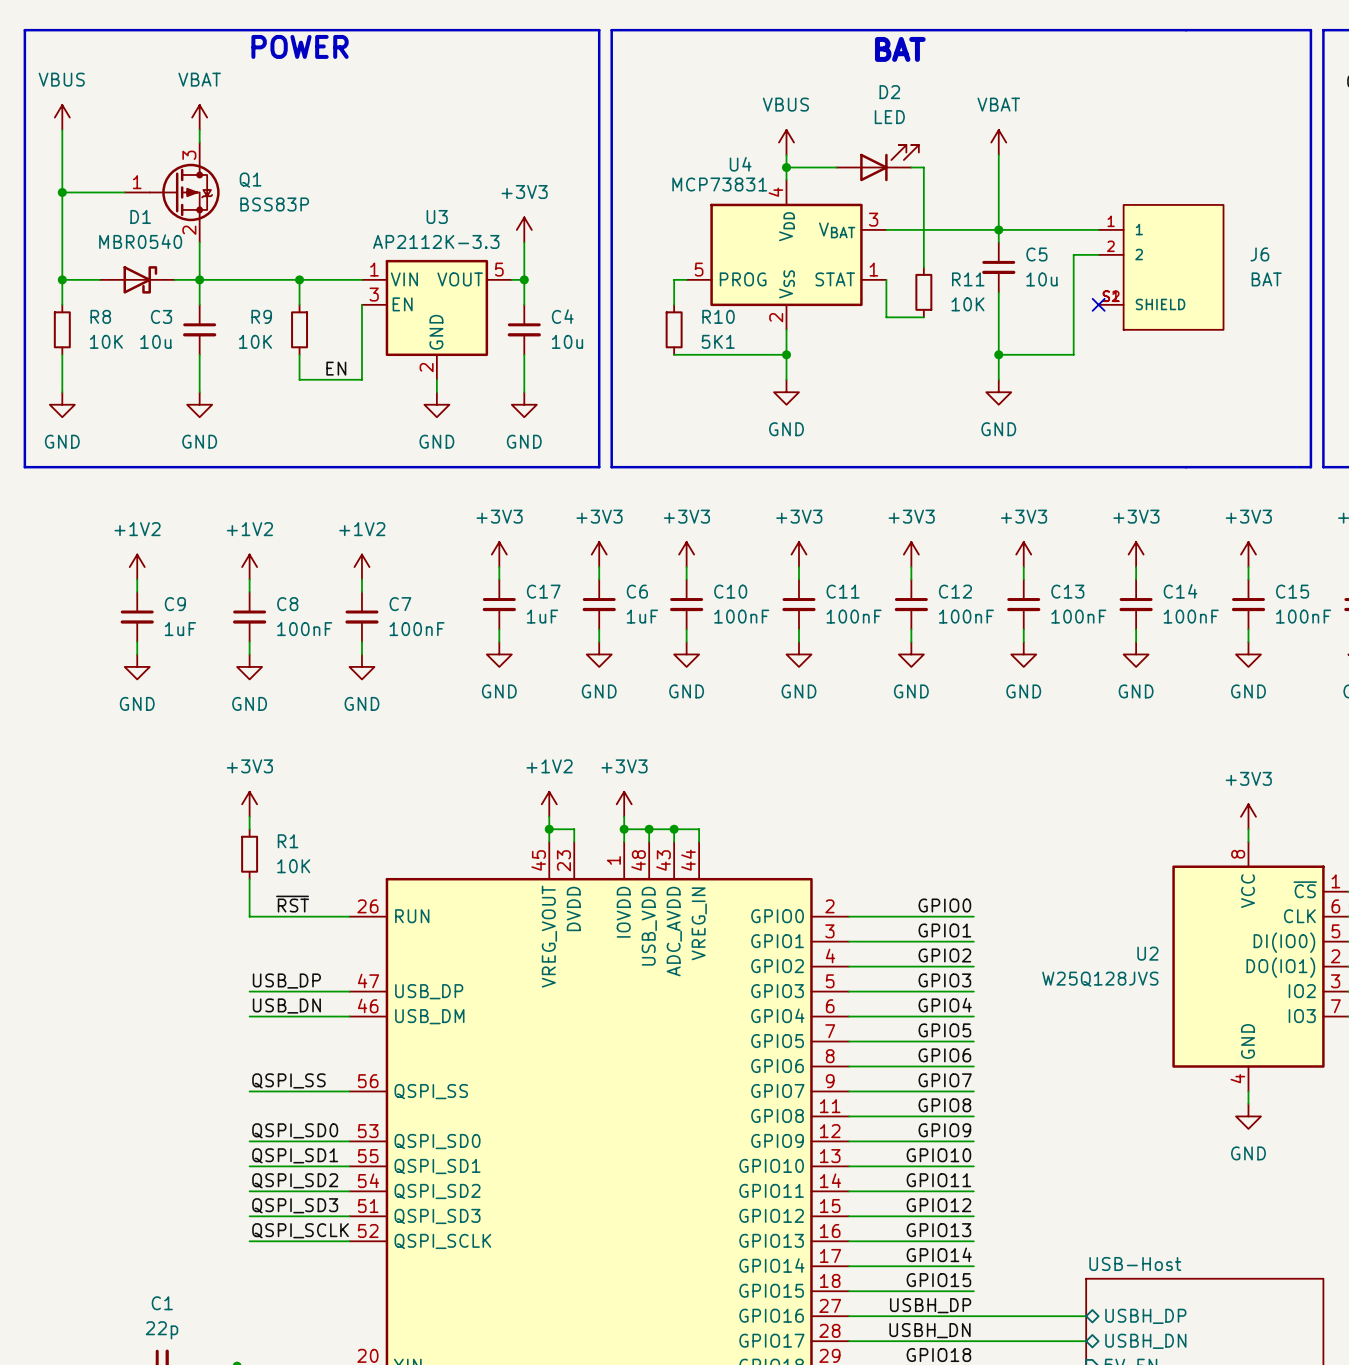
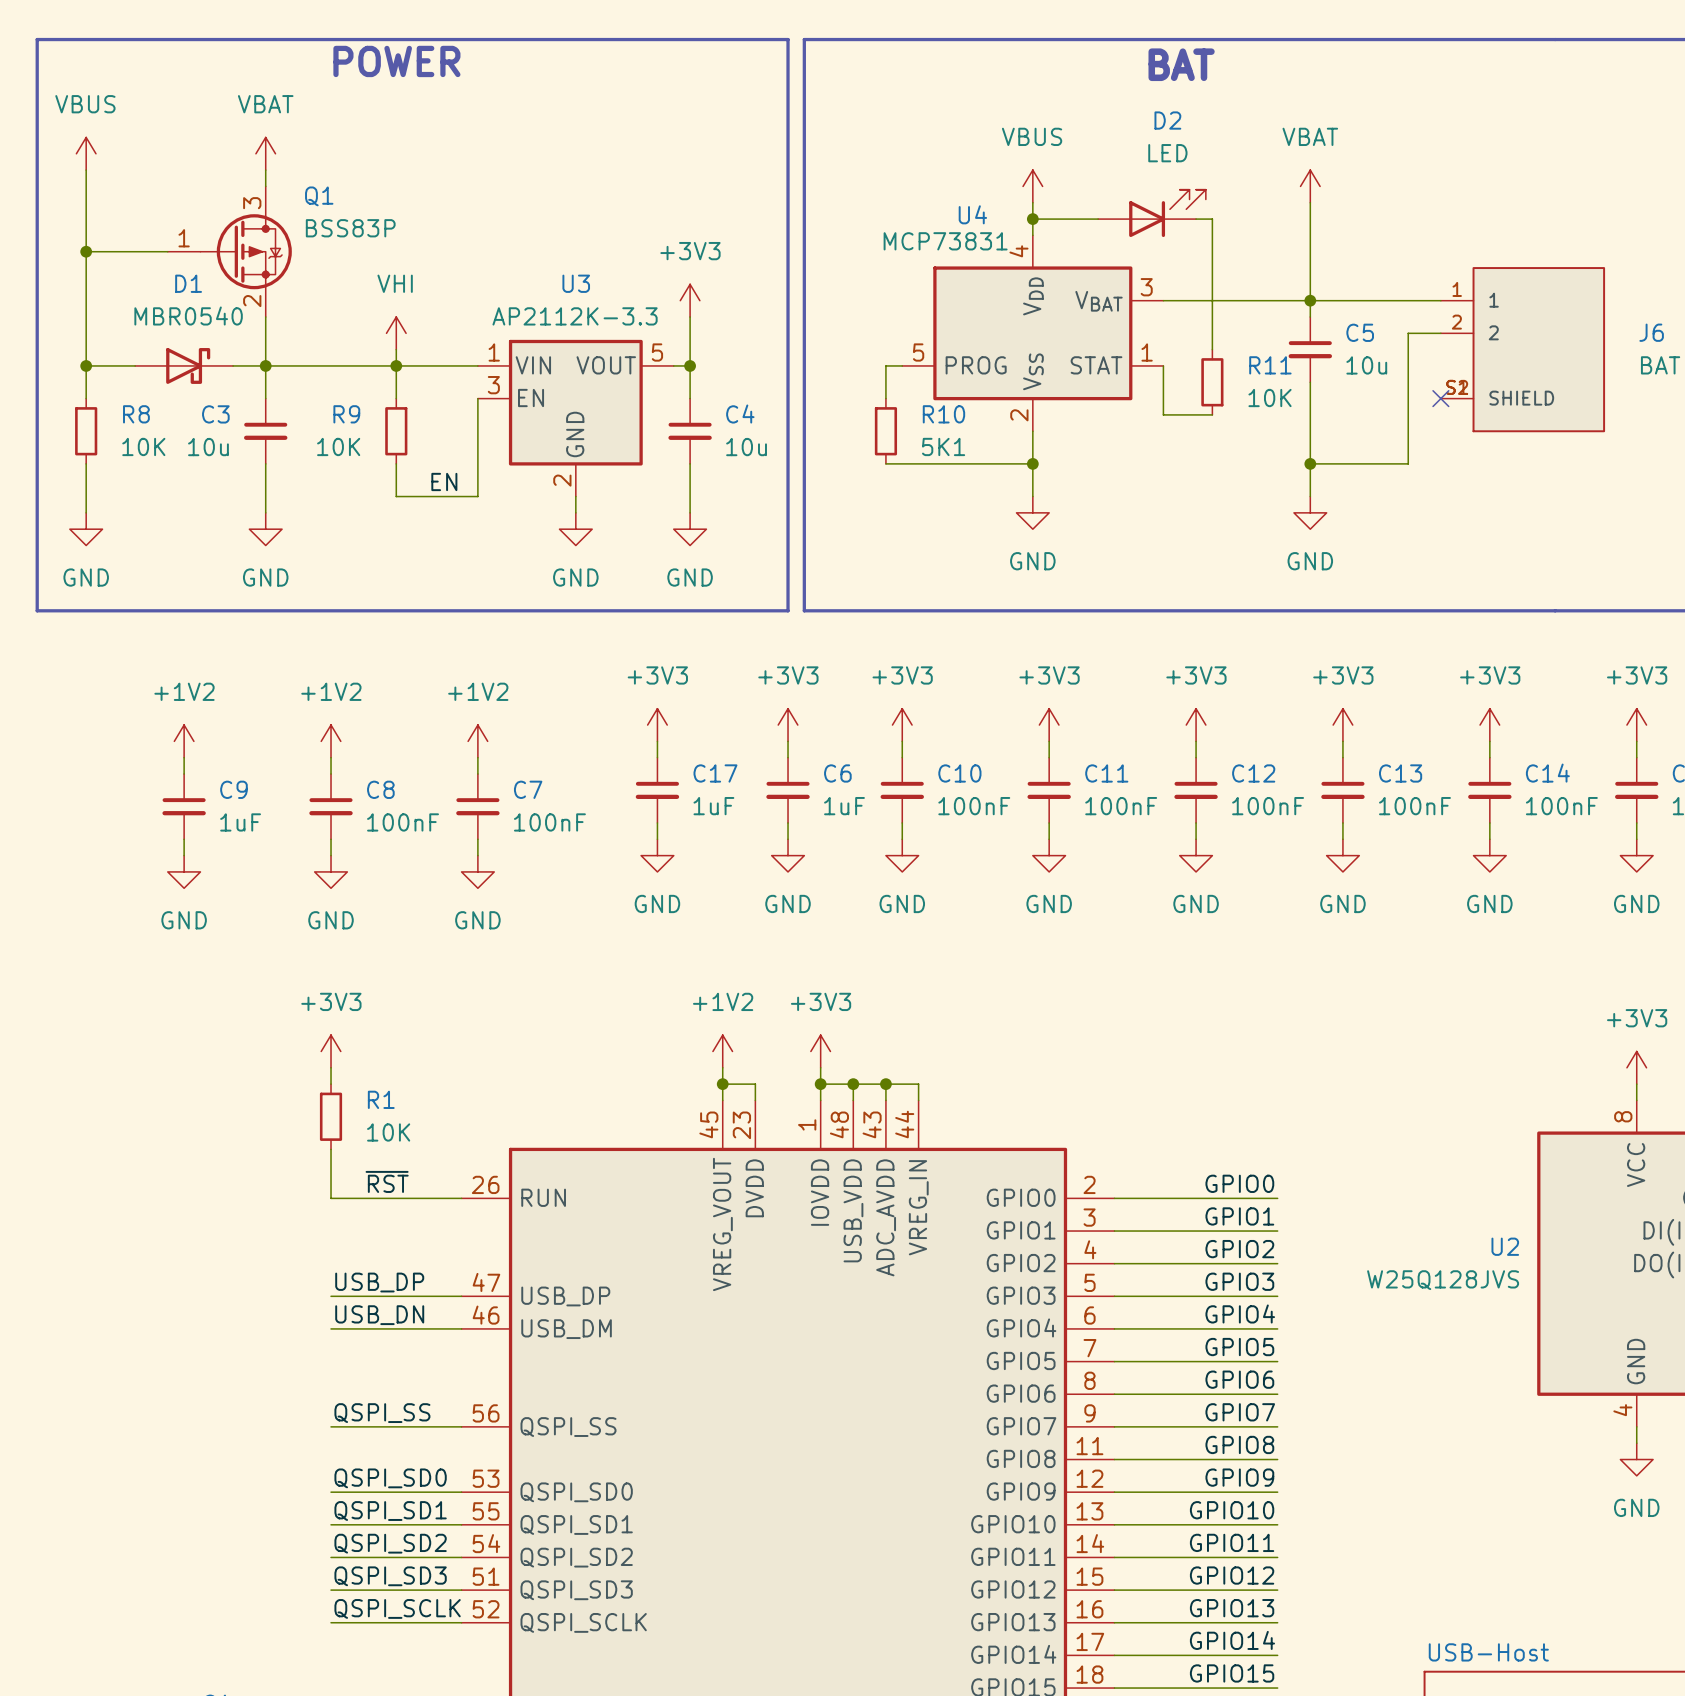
Q1 name position: Q1 (250, 180) -> Q1 (319, 196)
Q1 value position: BSS83P (274, 204) -> BSS83P (350, 228)
power symbol: none -> VHI (396, 333)
wire: none -> (396, 349) (396, 365)

